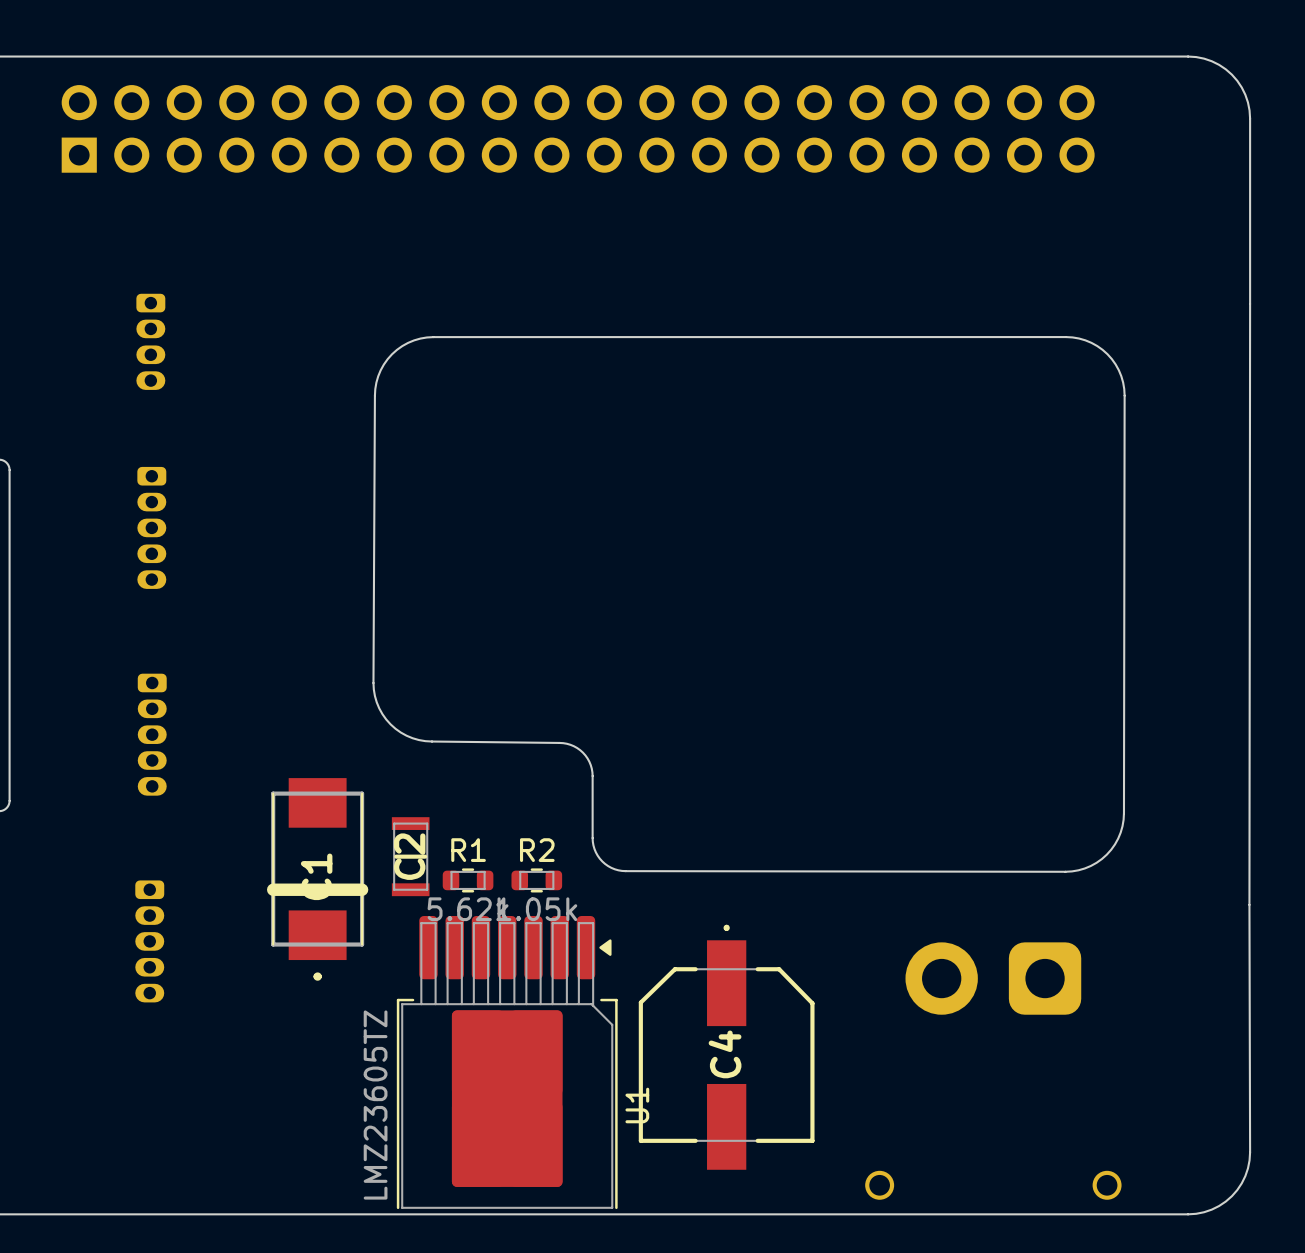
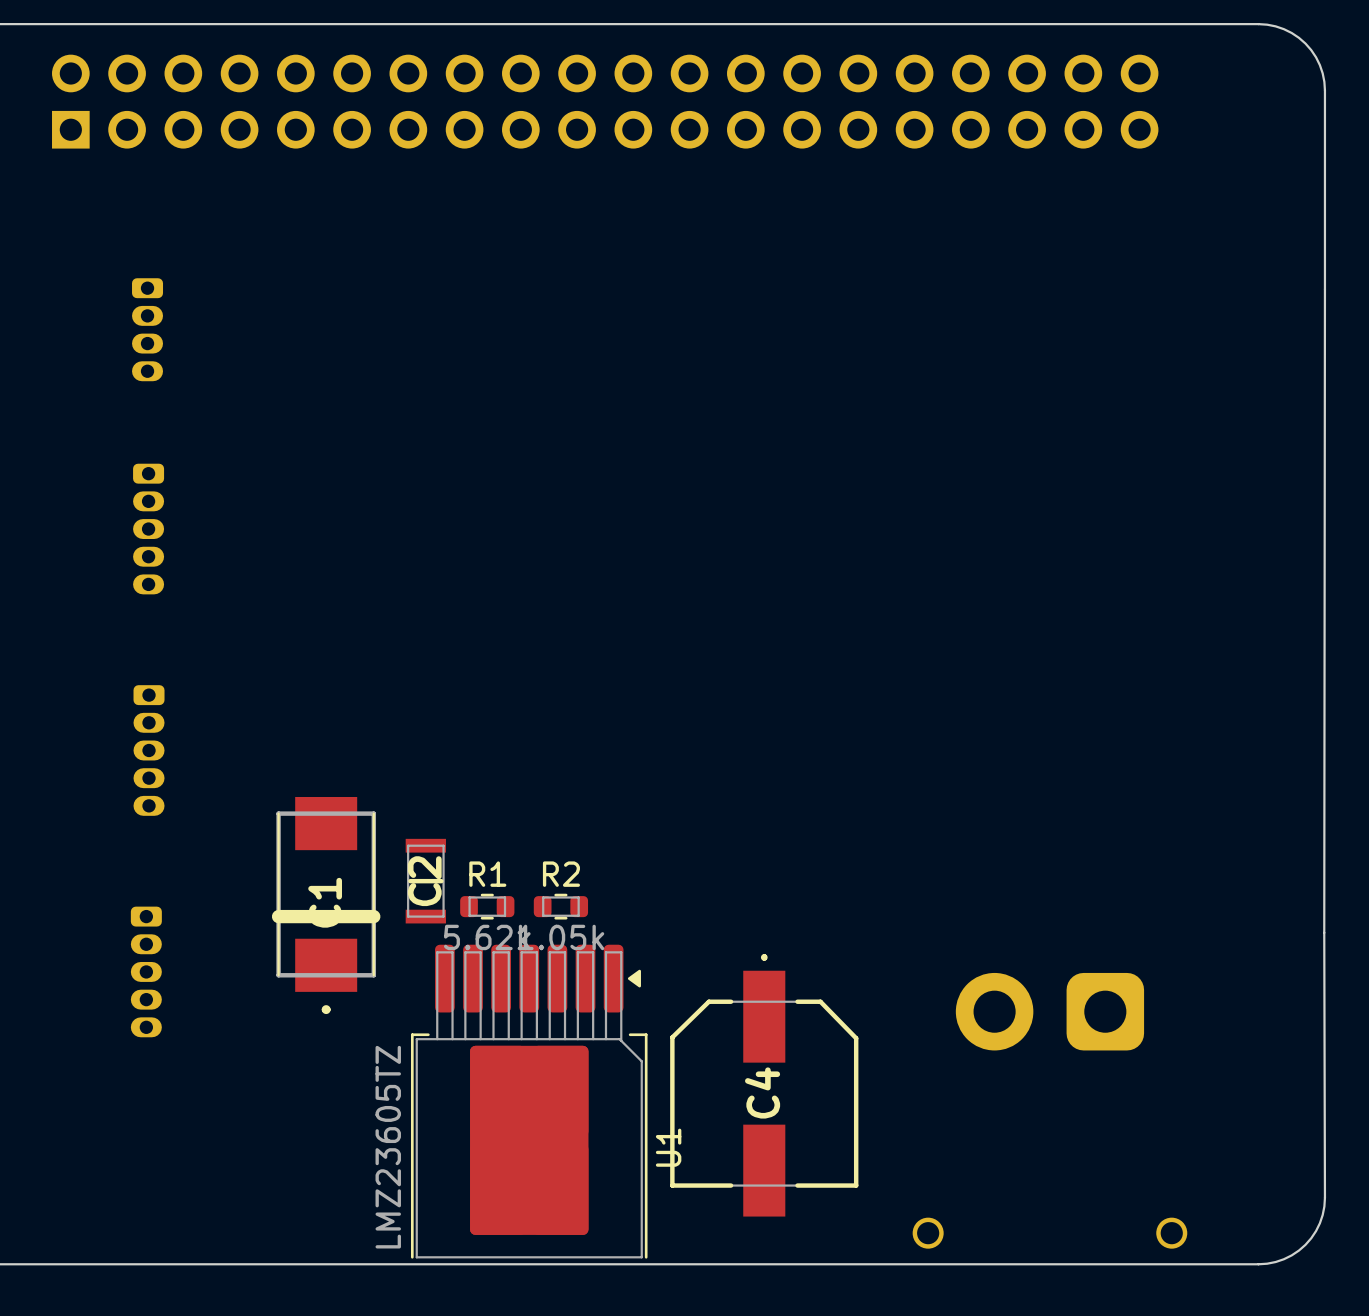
board edge: (433, 337) (1066, 337) (1085, 340) (1102, 349) (1118, 370) (1124, 395) (1123, 813) (1120, 832) (1111, 849) (1090, 865) (1065, 871) (622, 870) (605, 863) (594, 848) (591, 768) (585, 755) (577, 748) (559, 742) (425, 741) (406, 735) (395, 728) (382, 714) (373, 689) (375, 389) (380, 370) (392, 354) (408, 342) (433, 337) -> none

